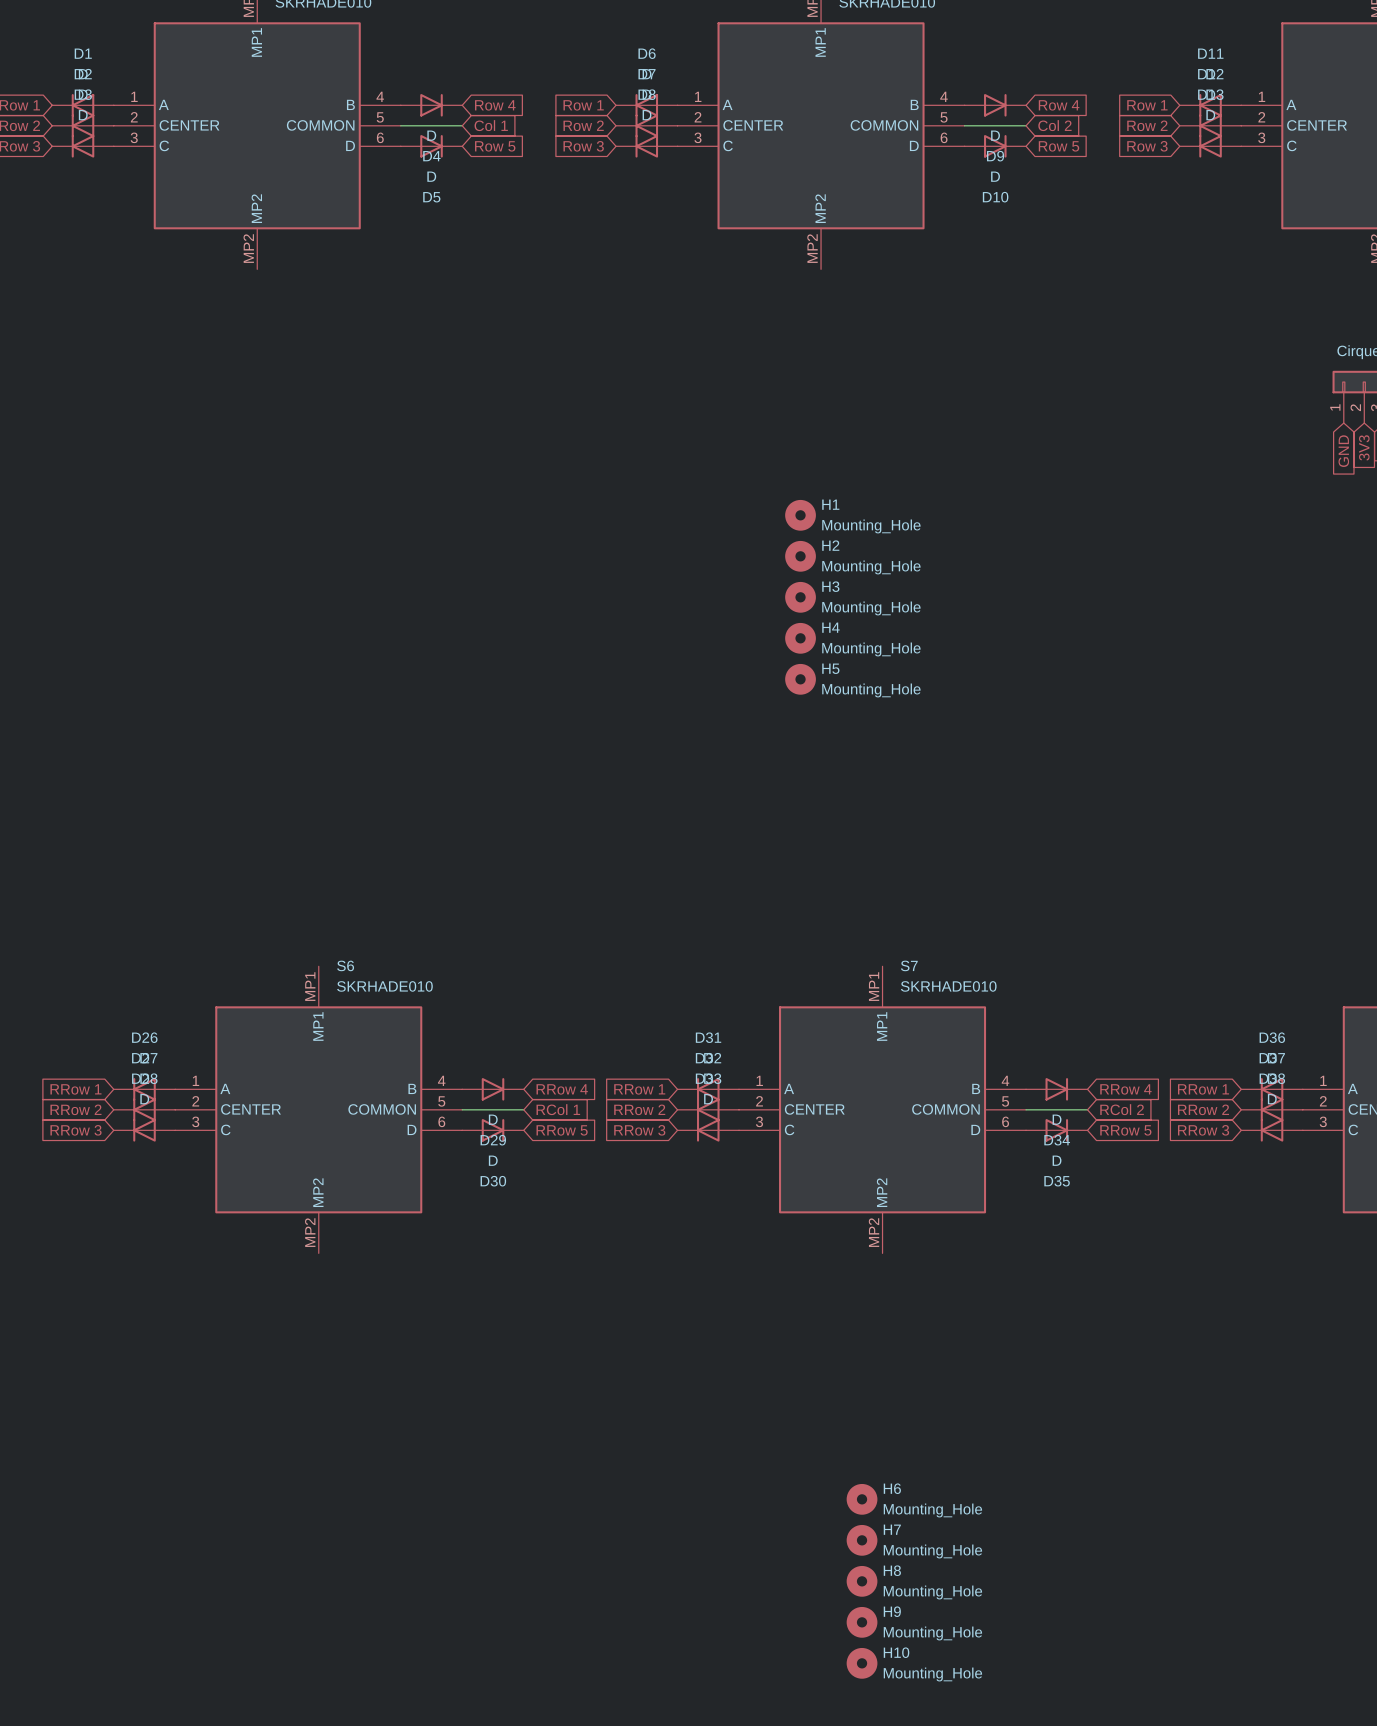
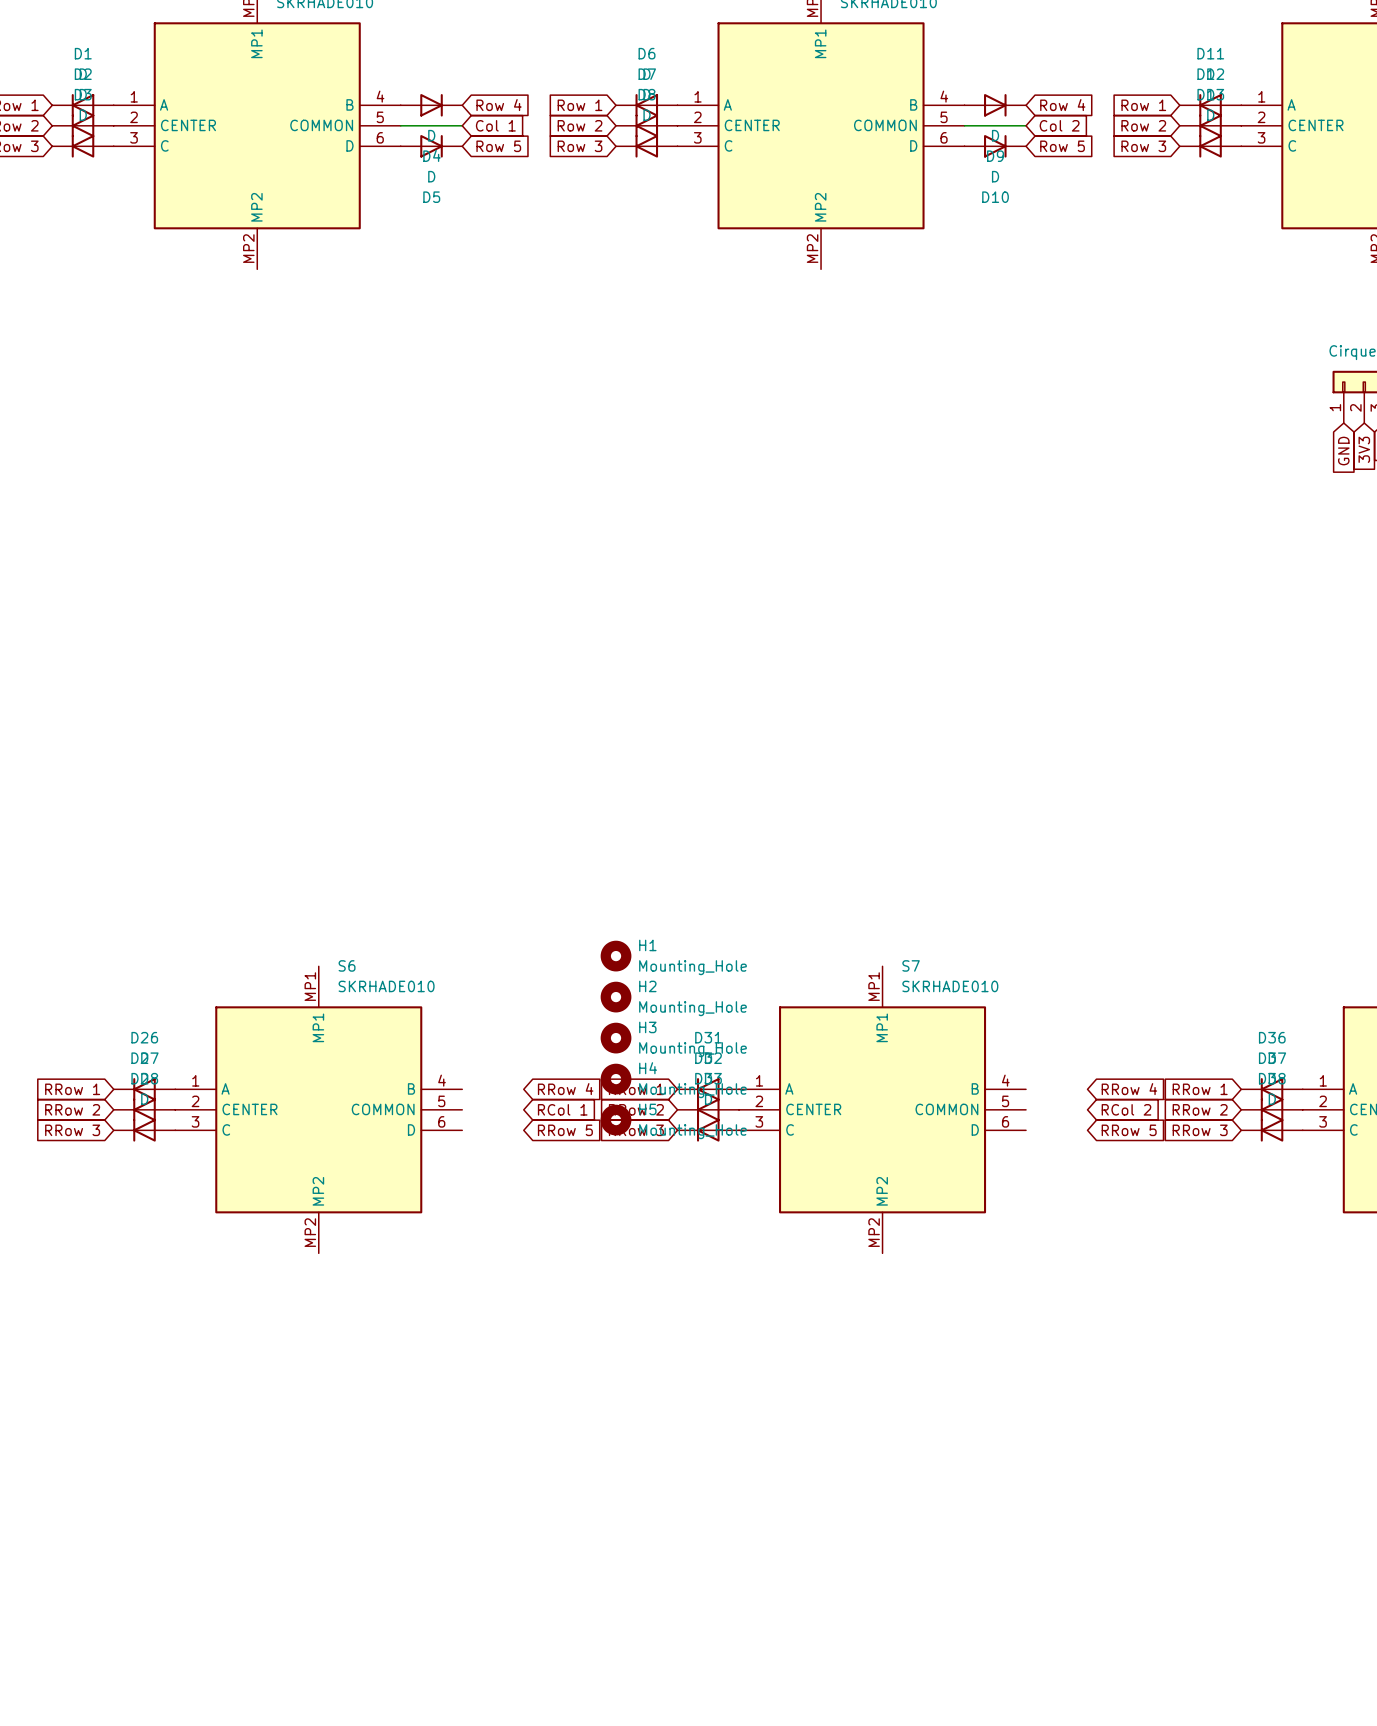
H1 position: (800, 515) -> (616, 956)
H2 position: (800, 556) -> (616, 997)
H3 position: (800, 597) -> (616, 1038)
H4 position: (800, 638) -> (616, 1079)
H5 position: (800, 679) -> (616, 1120)
D29: D (493, 1089) -> none
D34: D (1056, 1089) -> none
wire: (462, 1109) (523, 1109) -> none
wire: (1026, 1109) (1087, 1109) -> none
D30: D (493, 1130) -> none
D35: D (1056, 1130) -> none
H6: Mounting_Hole (862, 1499) -> none
H7: Mounting_Hole (862, 1540) -> none
H8: Mounting_Hole (862, 1581) -> none
H9: Mounting_Hole (862, 1622) -> none
H10: Mounting_Hole (862, 1663) -> none

